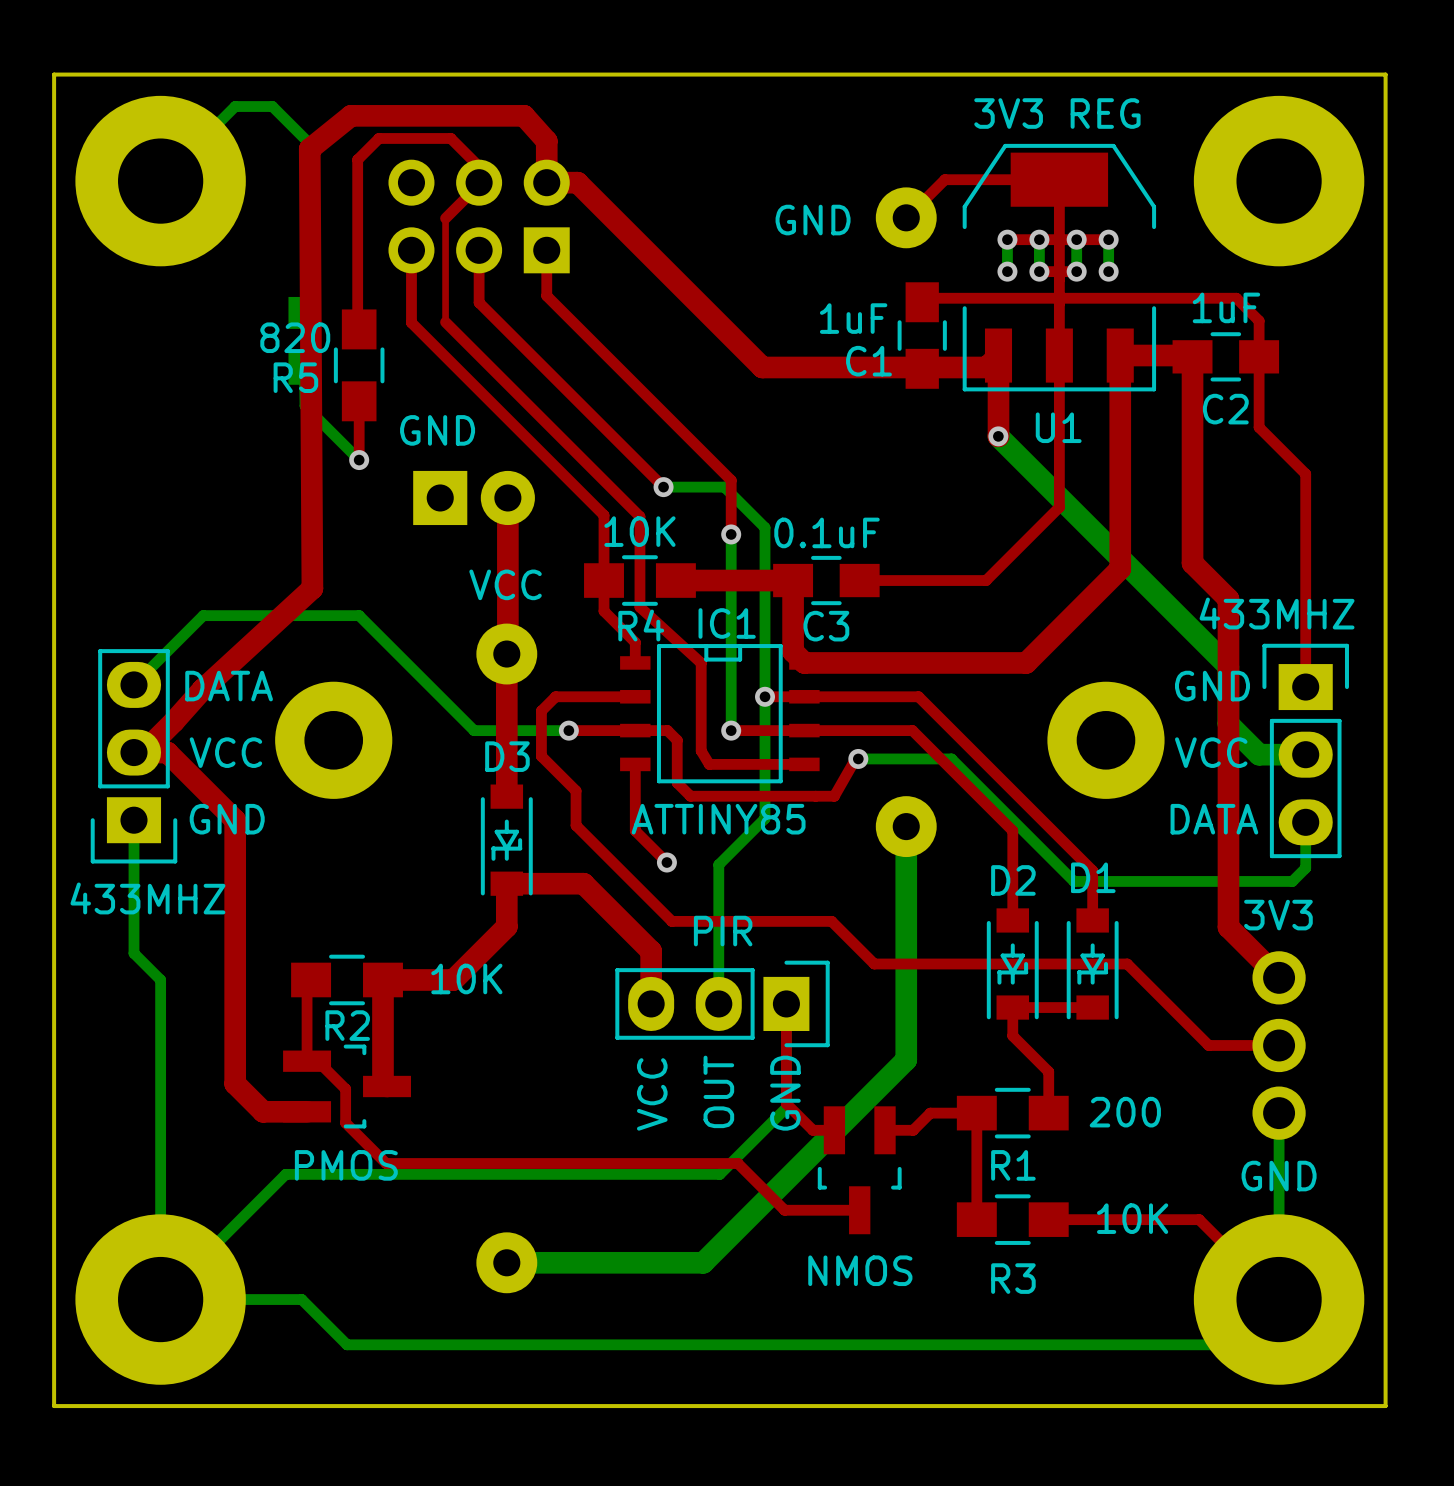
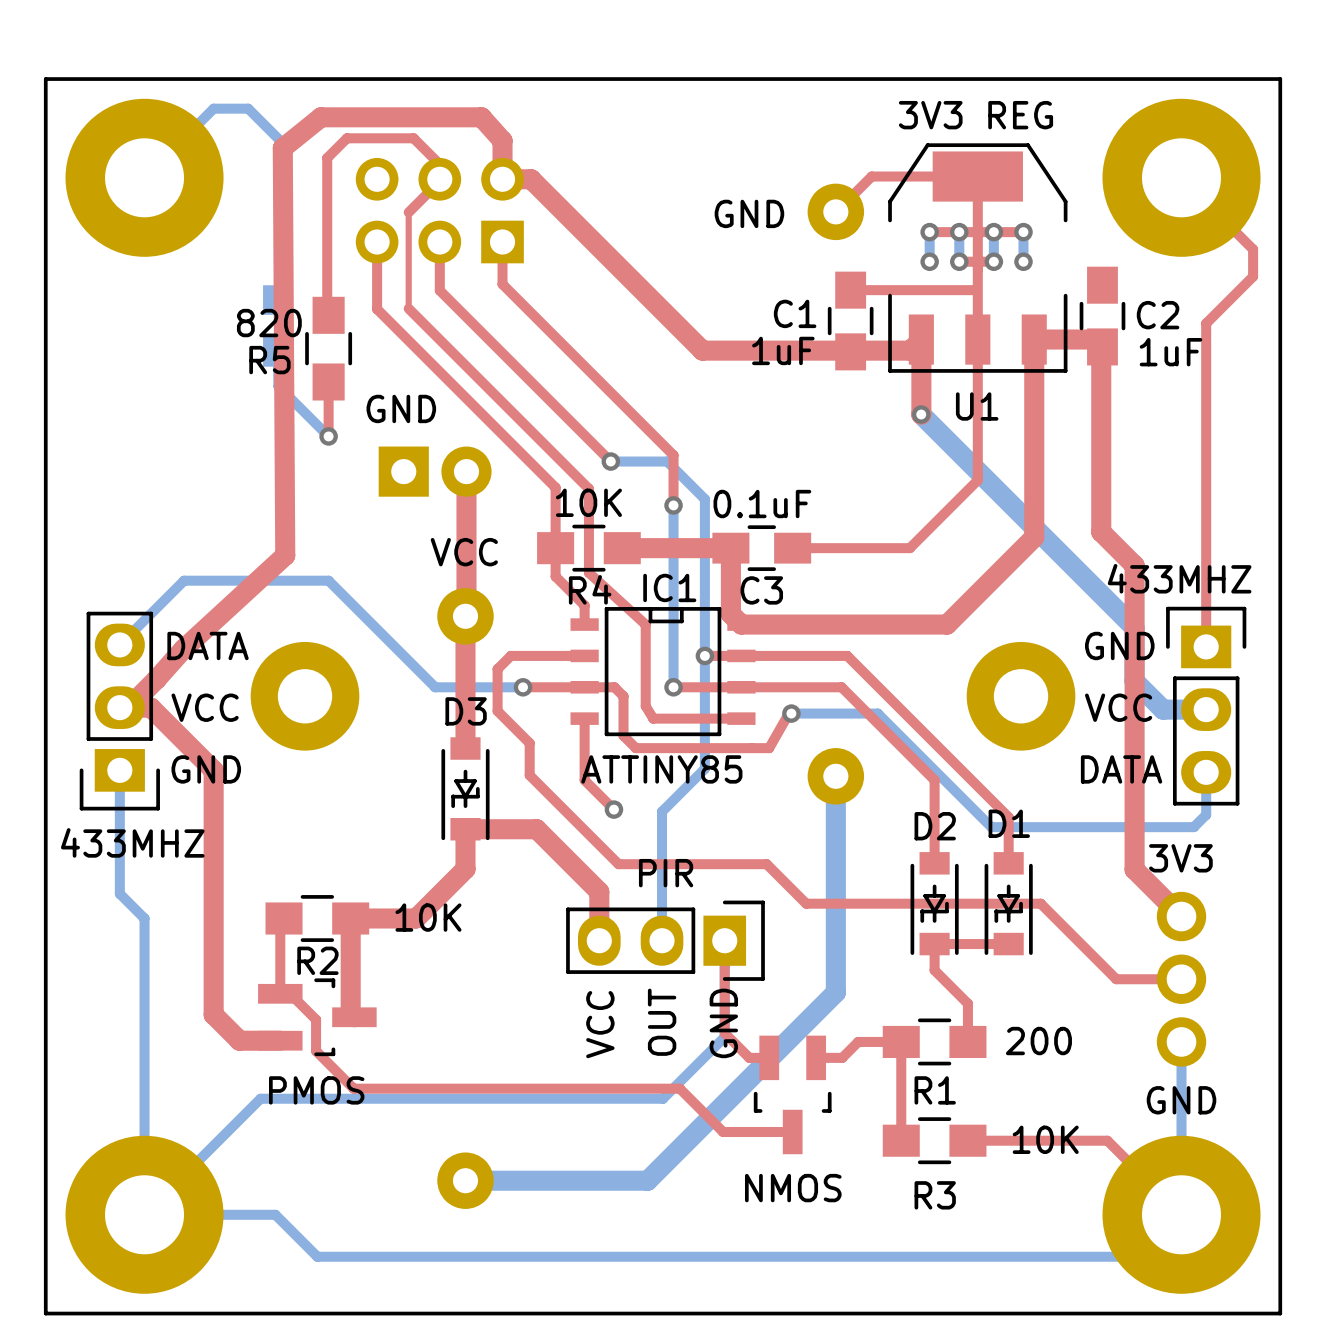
top track: none -> (1181, 177) (1253, 249) (1253, 276) (1206, 323) (1206, 449)
top track: (922, 302) (926, 298) (1236, 298) (1259, 320) (1259, 427) (1305, 474) -> (850, 290) (976, 290)
C1 value position: 1uF (853, 318) -> 1uF (783, 350)
C2 rotation: 0° (1225, 356) -> 90° clockwise (1102, 316)
C1 name position: C1 (868, 361) -> C1 (795, 313)
C2 name position: C2 (1225, 409) -> C2 (1158, 315)

